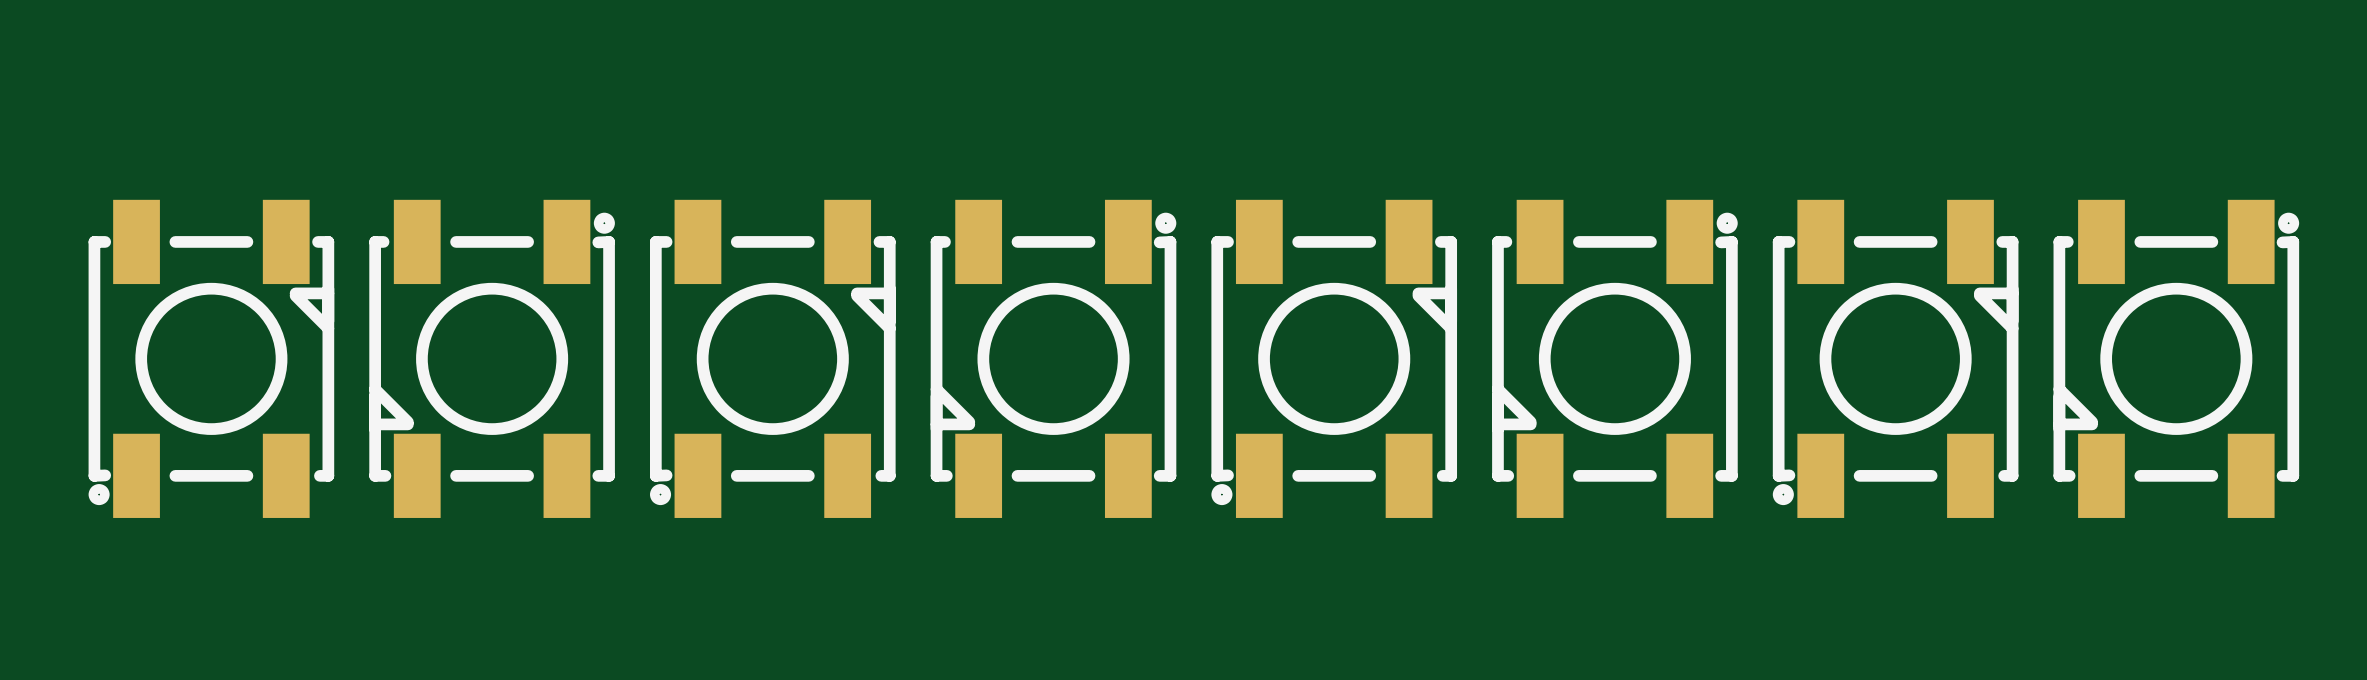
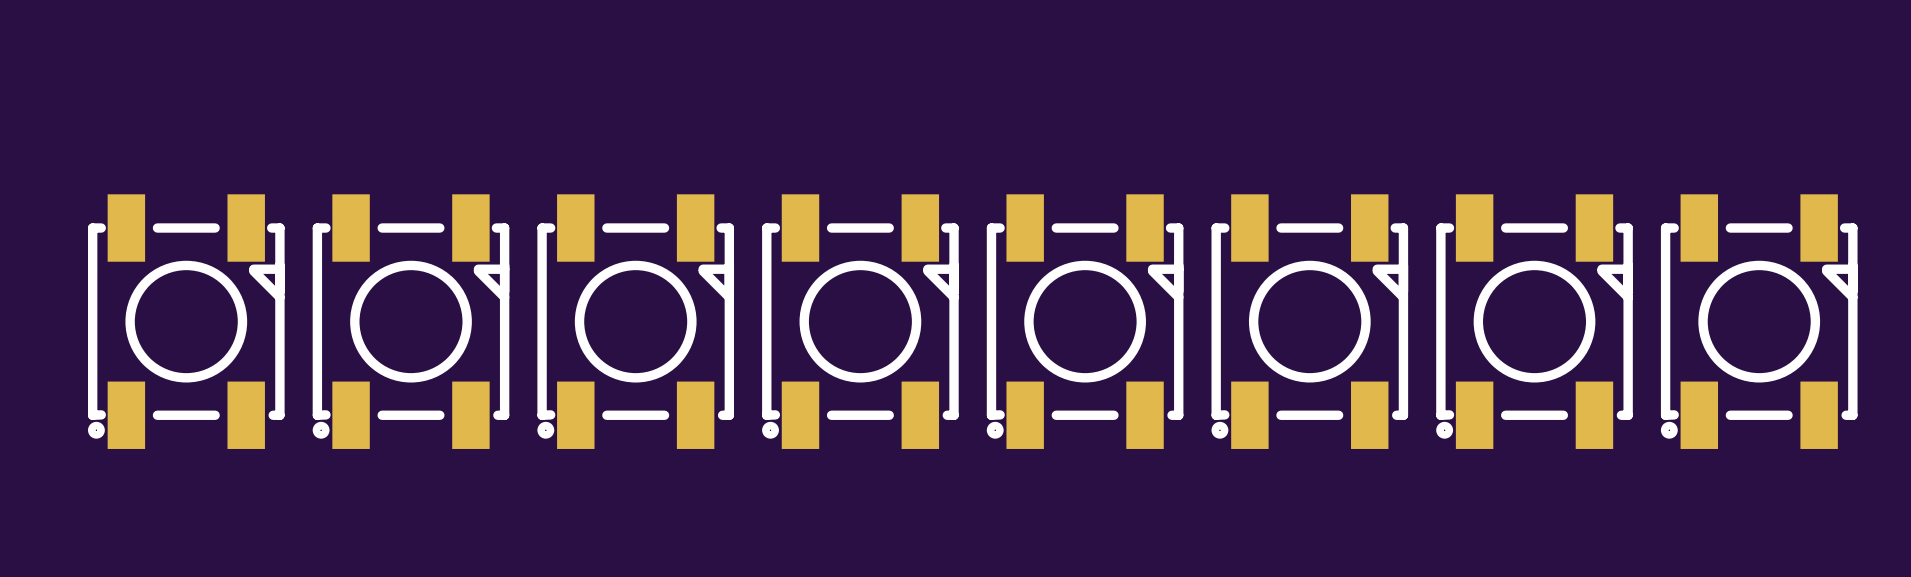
part rotation: 0° (492, 358) -> 180° (411, 321)
part rotation: 0° (1053, 358) -> 180° (860, 321)
part rotation: 0° (1614, 358) -> 180° (1309, 321)
part rotation: 0° (2176, 358) -> 180° (1759, 321)

